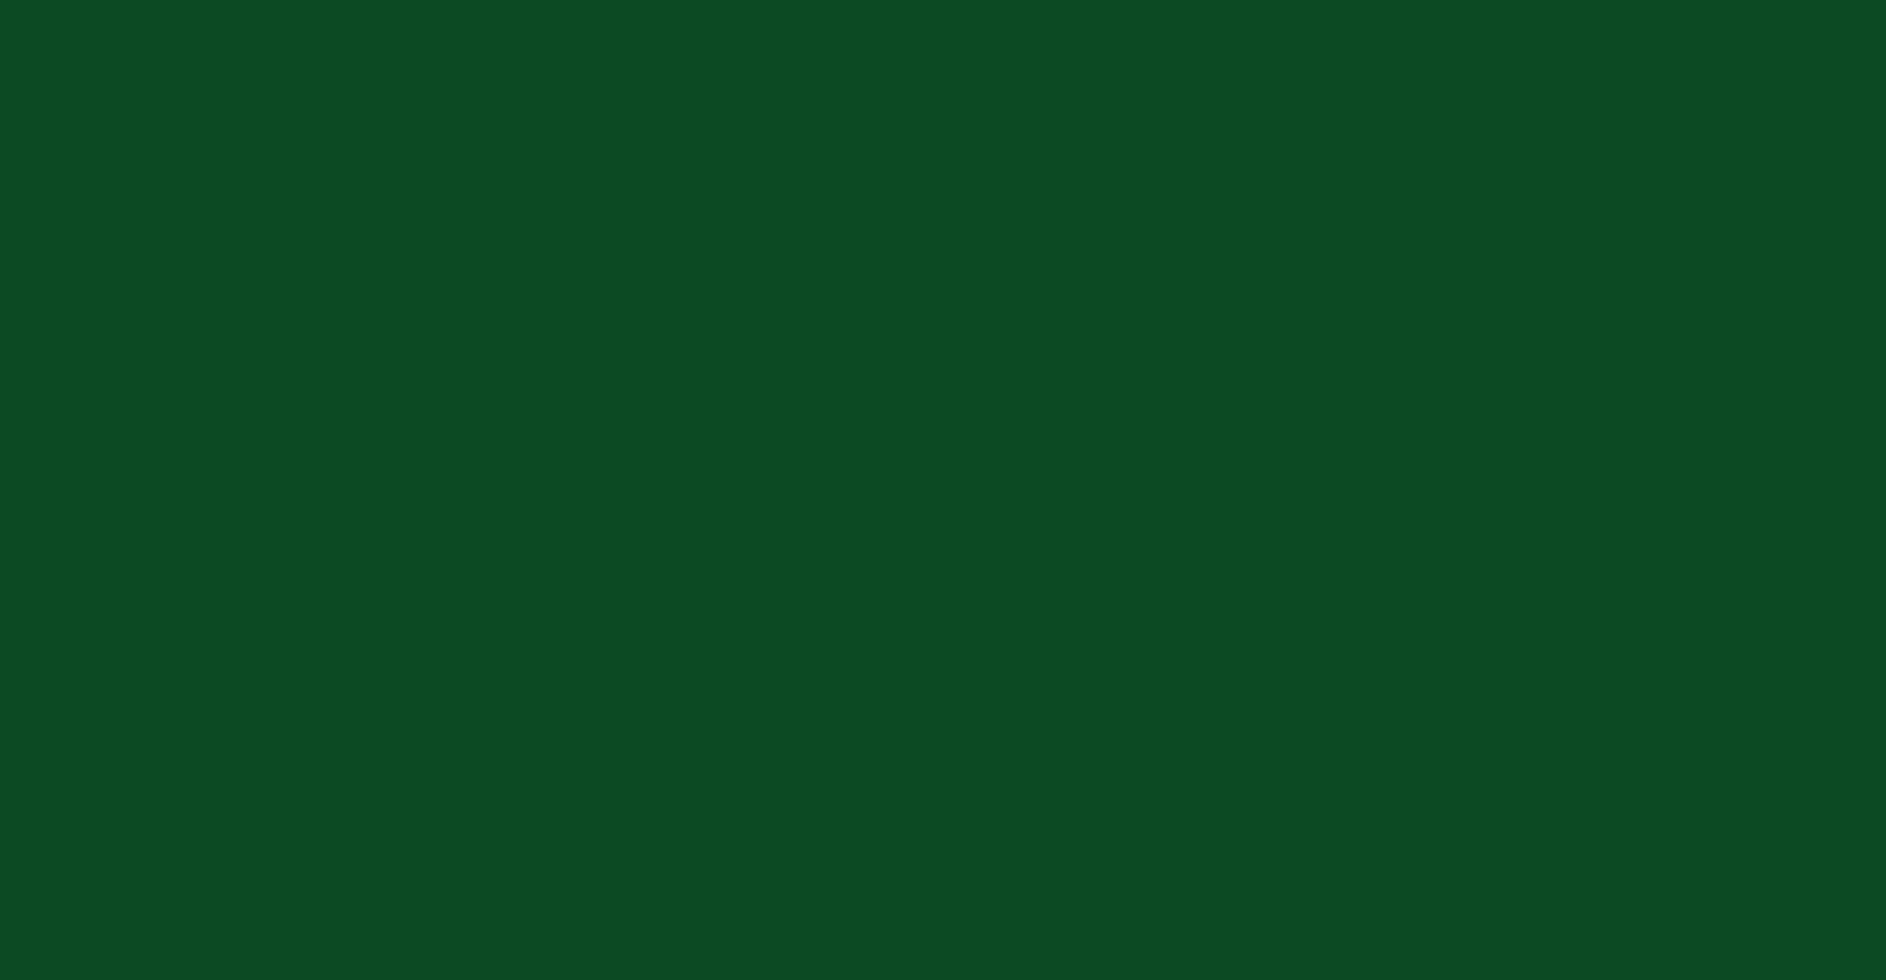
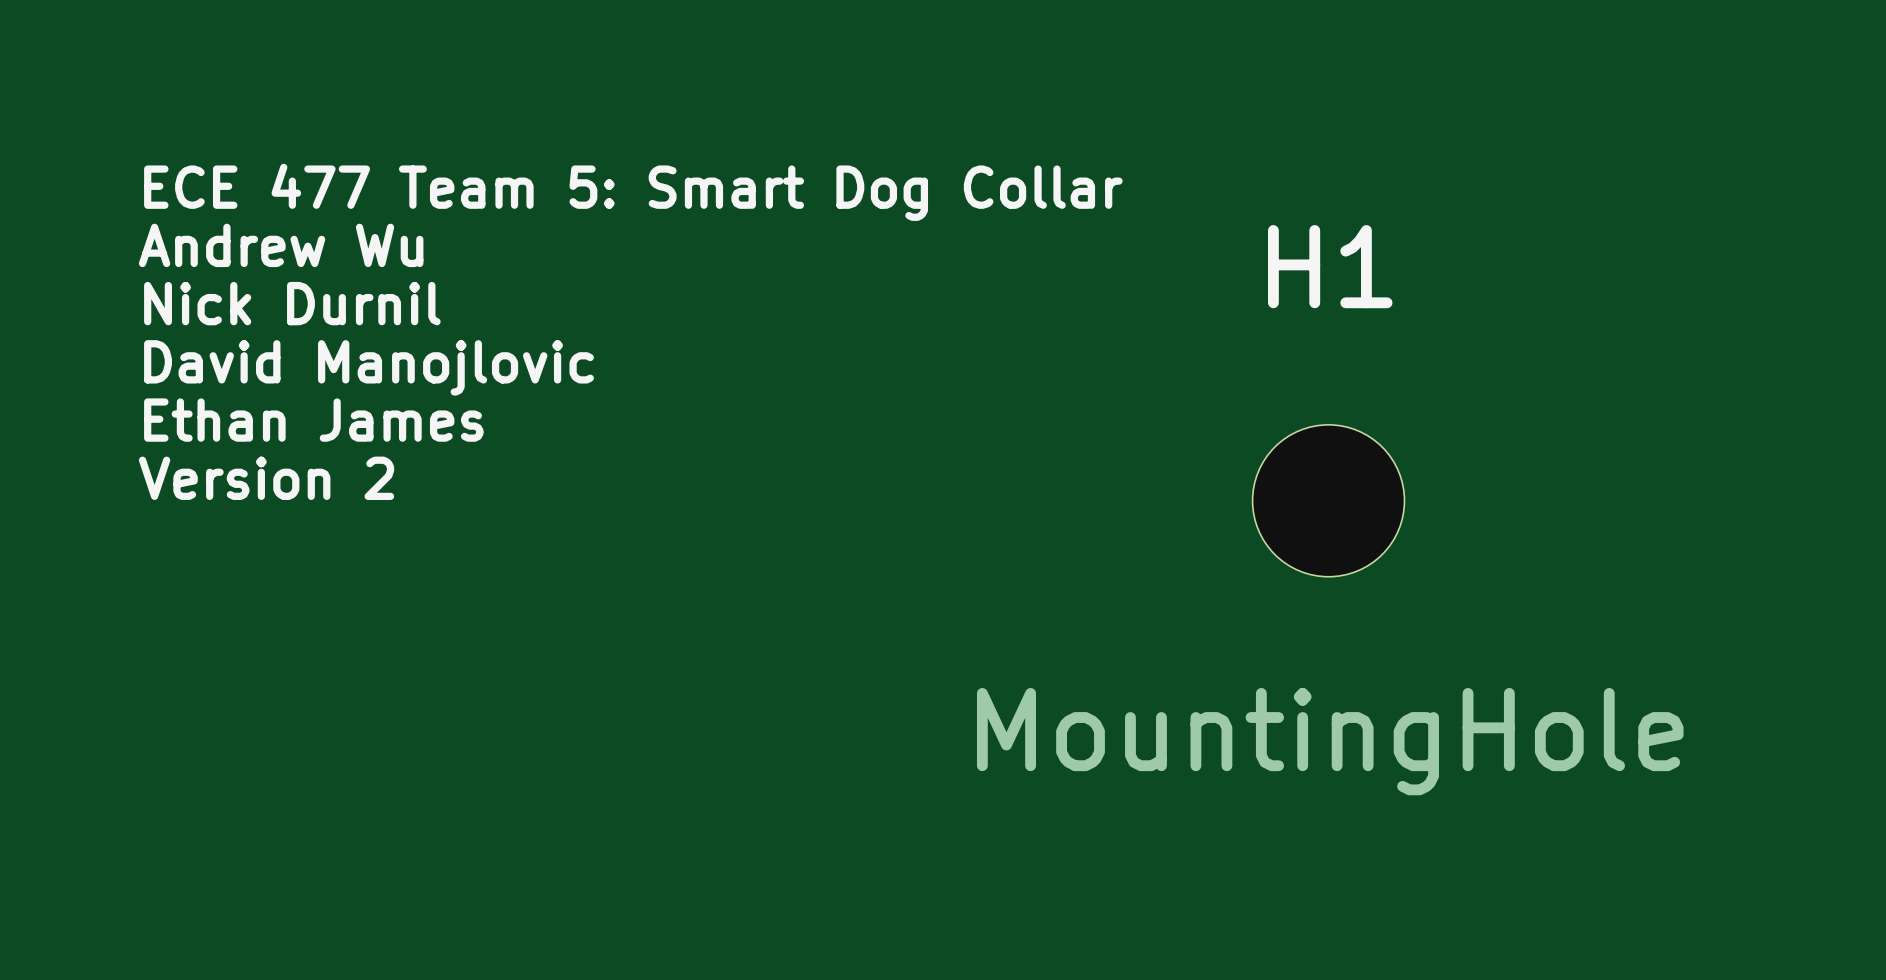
text: none -> ECE 477 Team 5: Smart Dog Collar (633, 192)
text: none -> Andrew Wu (281, 245)
text: none -> Nick Durnil (292, 303)
text: none -> David Manojlovic (368, 367)
text: none -> Ethan James (313, 420)
text: none -> Version 2 (266, 478)
H1: none -> MountingHole (1328, 500)

